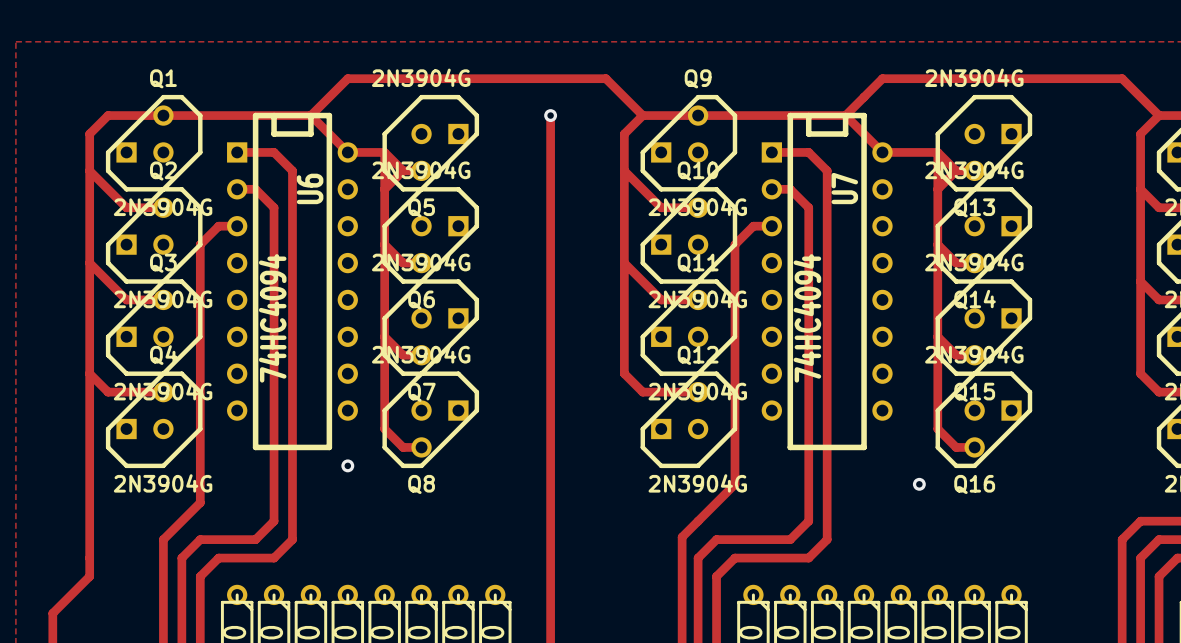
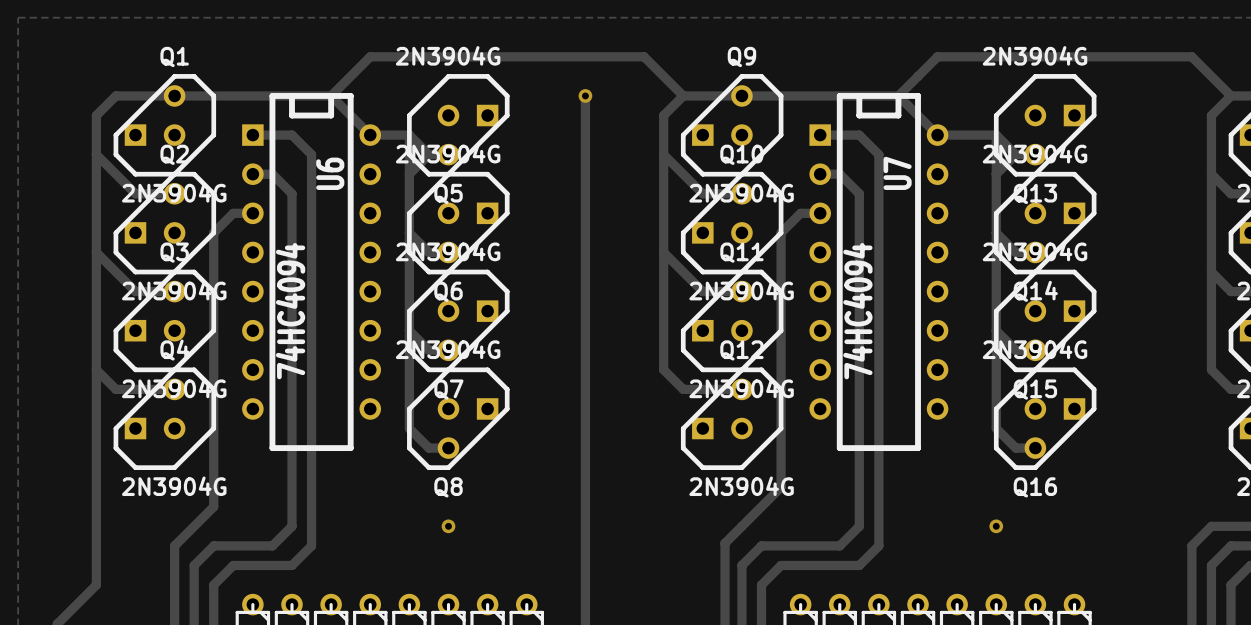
via: (347, 465) -> none
via position: (919, 484) -> (996, 526)
via: none -> (448, 526)

